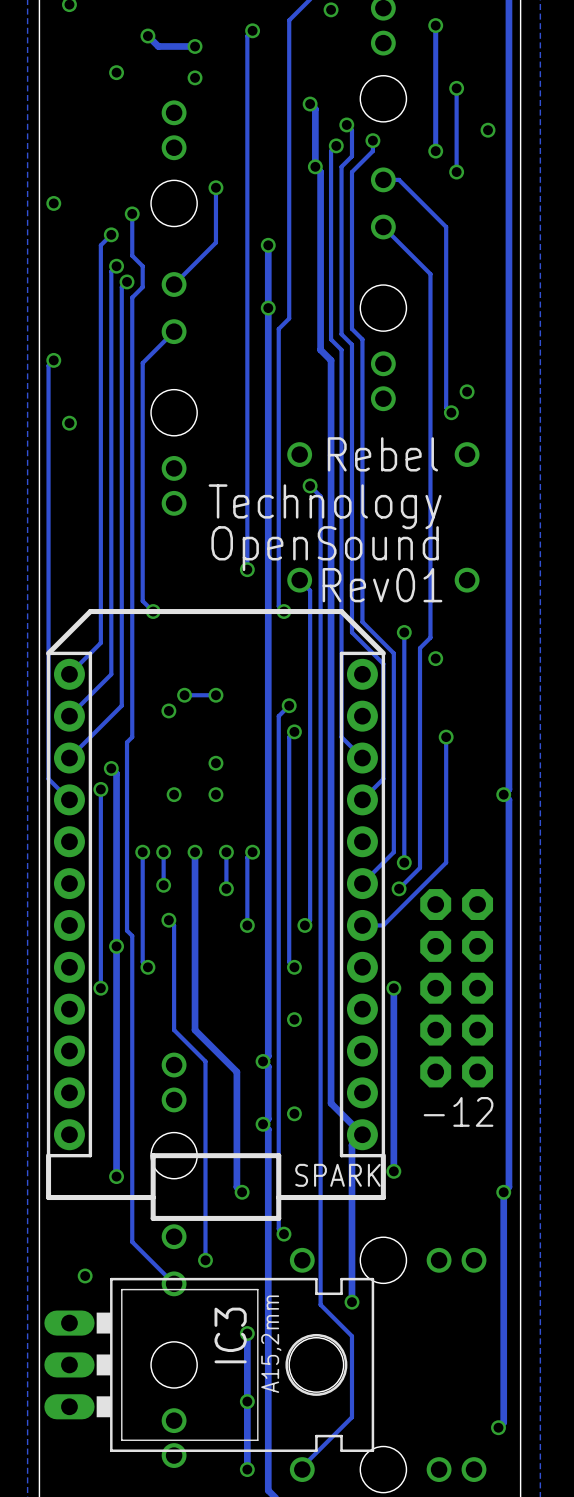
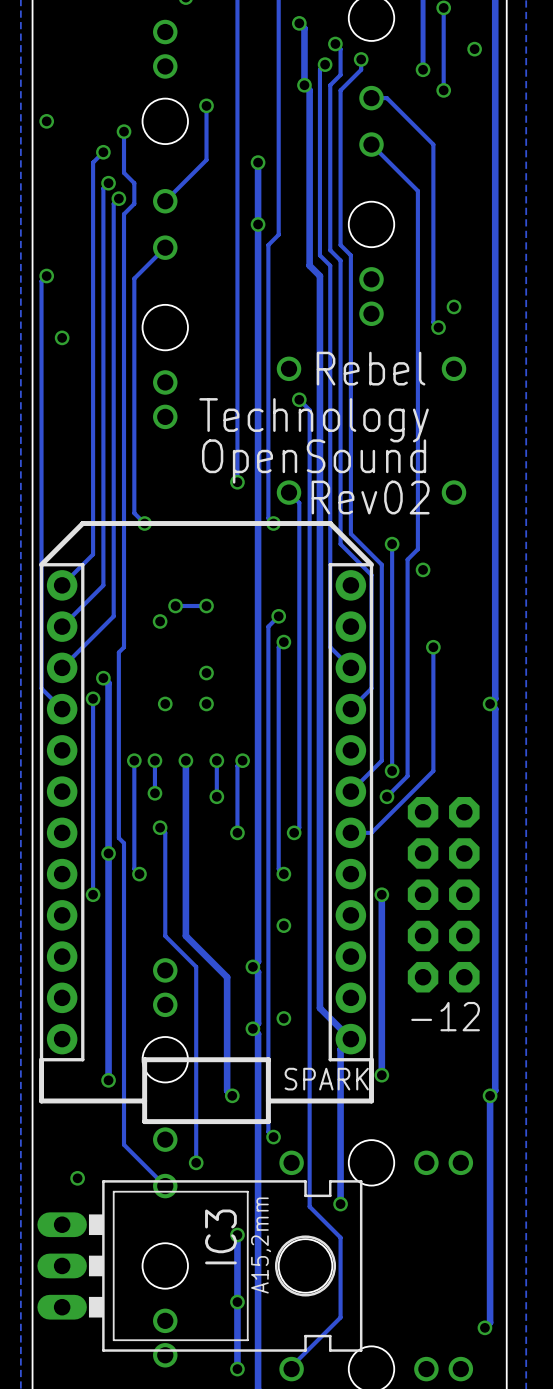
text: Rev01 (382, 585) -> Rev02 (370, 497)

